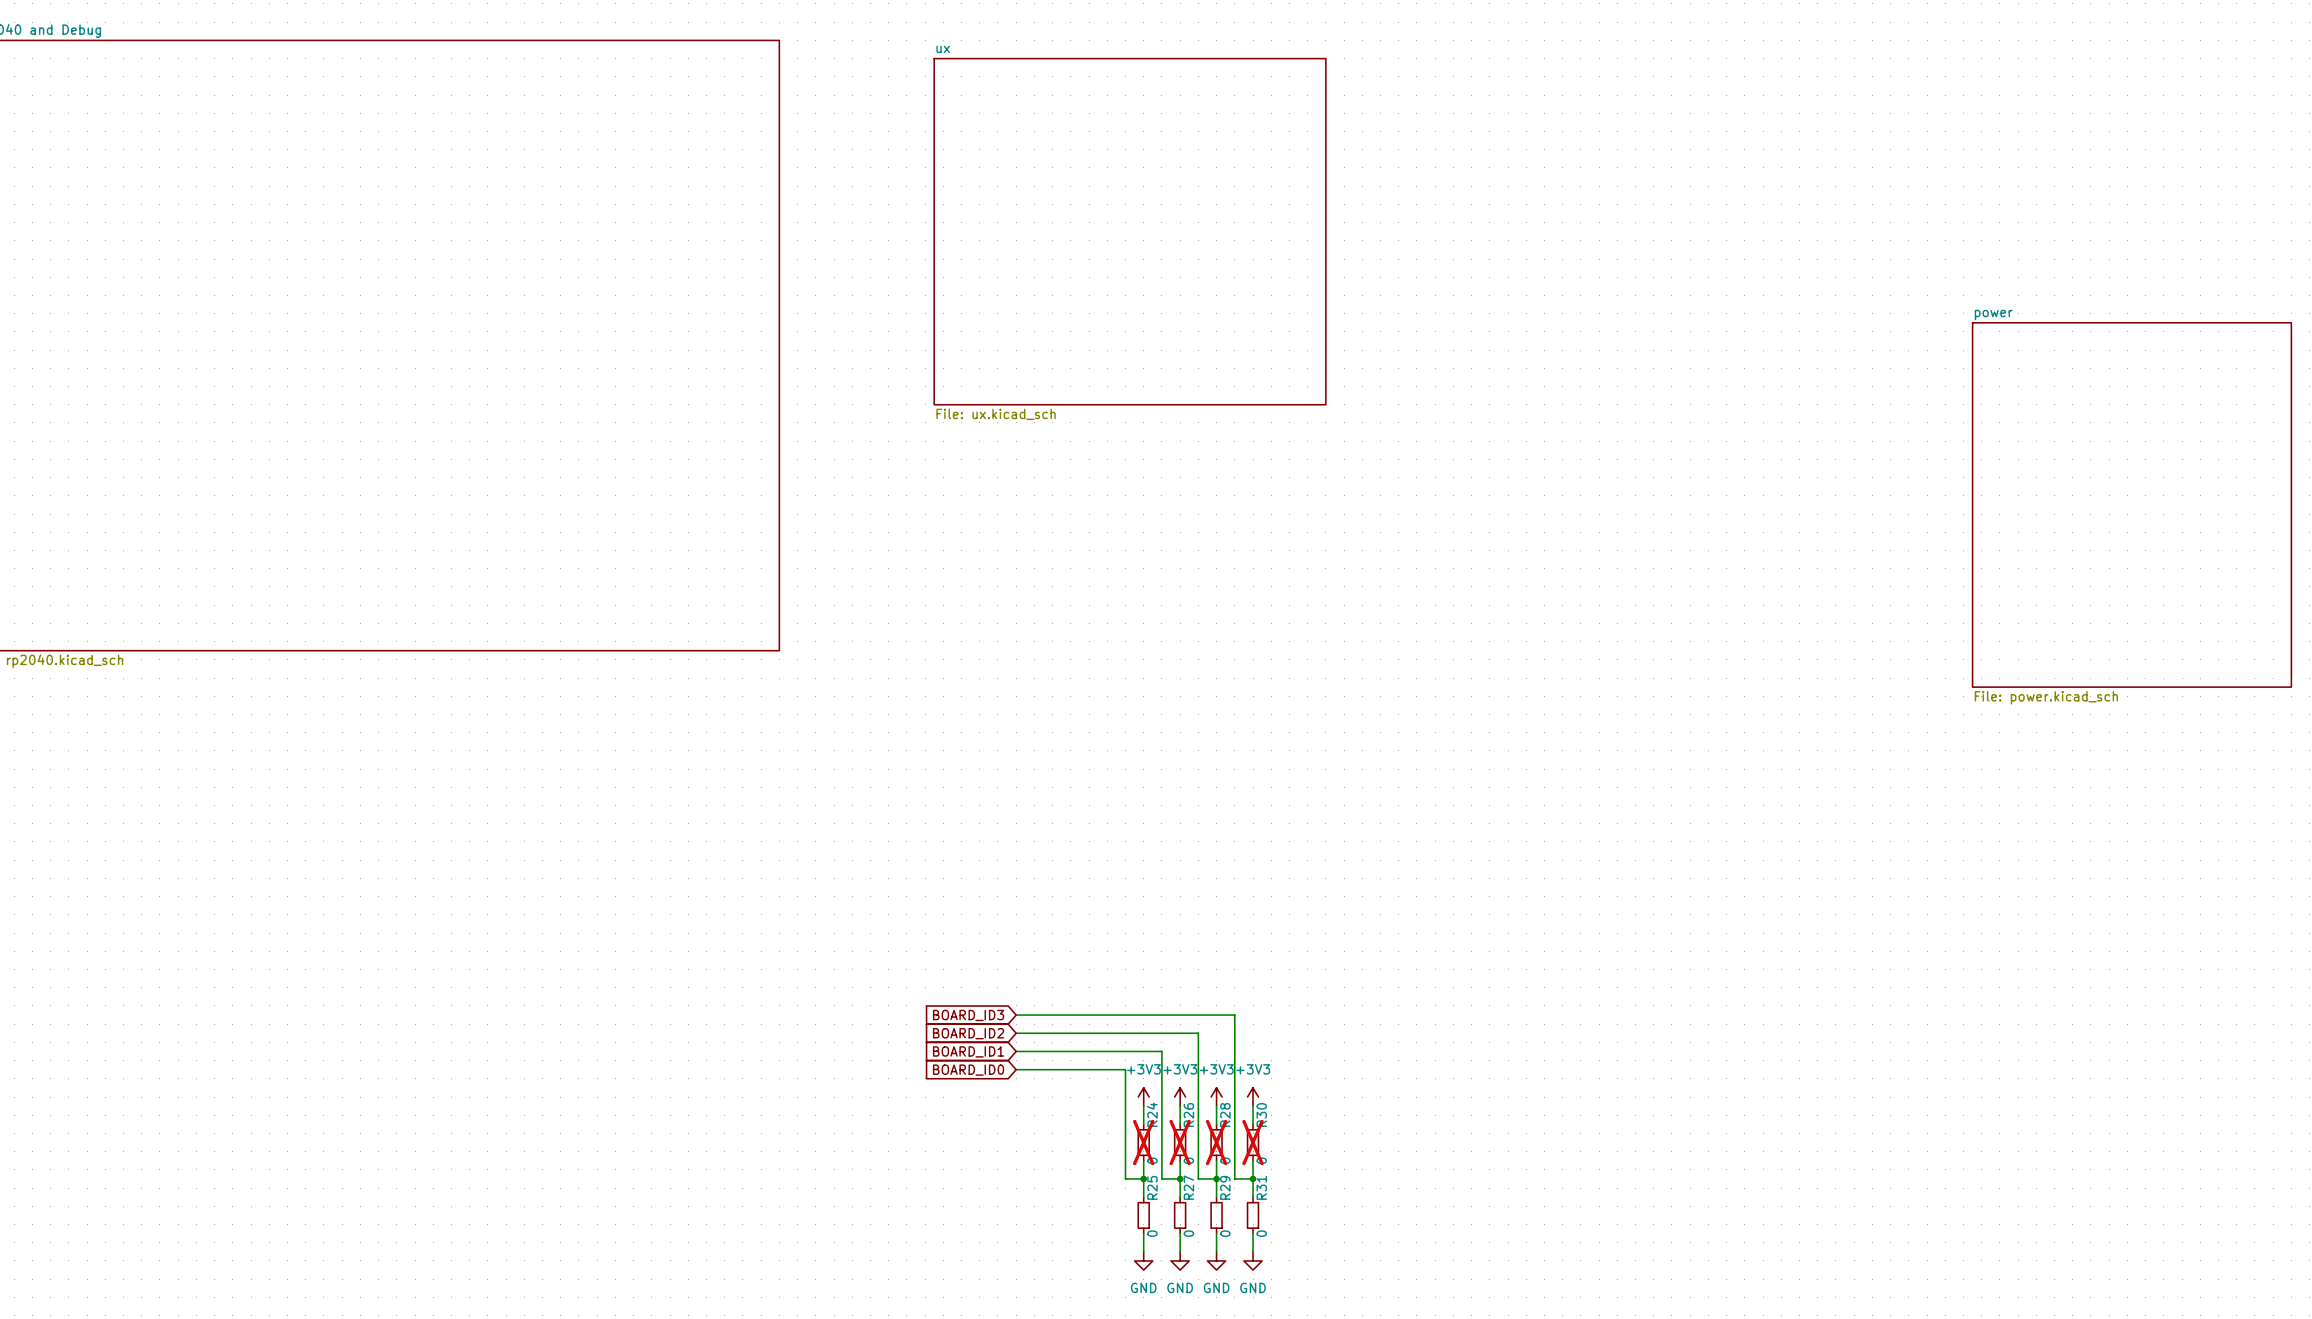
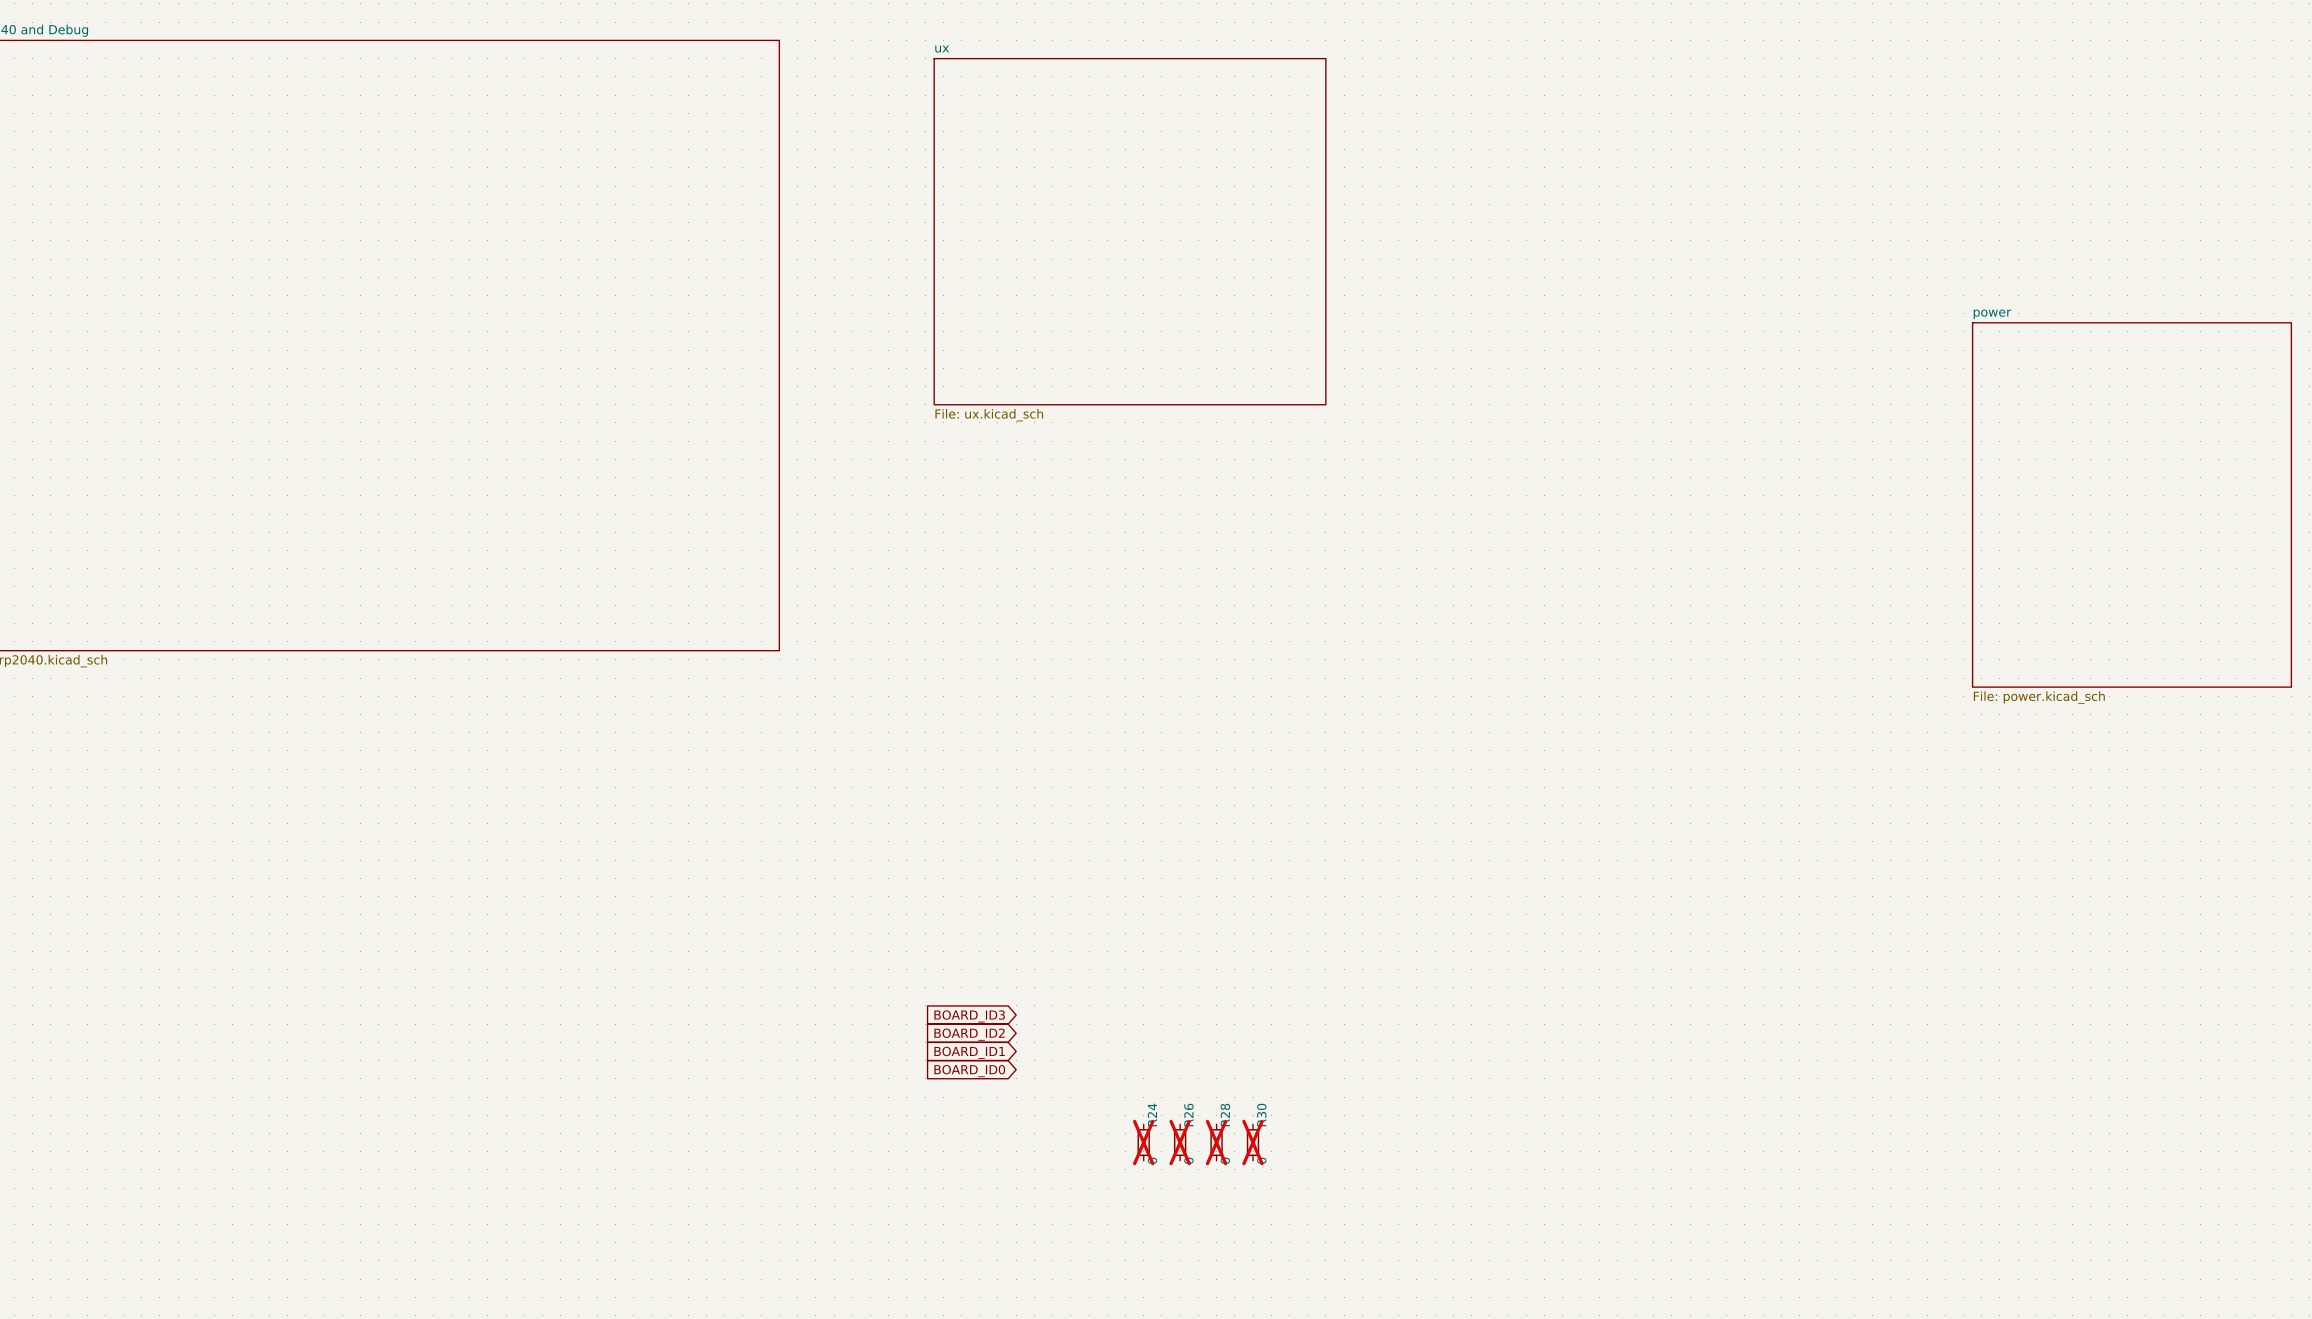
wire: (1016, 1015) (1234, 1015) (1234, 1178) (1253, 1178) -> none
wire: (1016, 1033) (1198, 1033) (1198, 1178) (1216, 1178) -> none
wire: (1016, 1051) (1161, 1051) (1161, 1178) (1180, 1178) -> none
wire: (1016, 1069) (1125, 1069) (1125, 1178) (1143, 1178) -> none
power symbol: +3V3 (1143, 1097) -> none
power symbol: +3V3 (1180, 1097) -> none
power symbol: +3V3 (1216, 1097) -> none
power symbol: +3V3 (1253, 1097) -> none
wire: (1143, 1106) (1143, 1124) -> none
wire: (1180, 1106) (1180, 1124) -> none
wire: (1216, 1106) (1216, 1124) -> none
wire: (1253, 1106) (1253, 1124) -> none
wire: (1143, 1160) (1143, 1197) -> none
wire: (1180, 1160) (1180, 1197) -> none
wire: (1216, 1160) (1216, 1197) -> none
wire: (1253, 1160) (1253, 1197) -> none
junction: (1143, 1178) -> none
junction: (1180, 1178) -> none
junction: (1216, 1178) -> none
junction: (1253, 1178) -> none
R25: 0 (1143, 1215) -> none
R27: 0 (1180, 1215) -> none
R29: 0 (1216, 1215) -> none
R31: 0 (1253, 1215) -> none
wire: (1143, 1233) (1143, 1251) -> none
wire: (1180, 1233) (1180, 1251) -> none
wire: (1216, 1233) (1216, 1251) -> none
wire: (1253, 1233) (1253, 1251) -> none
power symbol: GND (1143, 1260) -> none
power symbol: GND (1180, 1260) -> none
power symbol: GND (1216, 1260) -> none
power symbol: GND (1253, 1260) -> none

